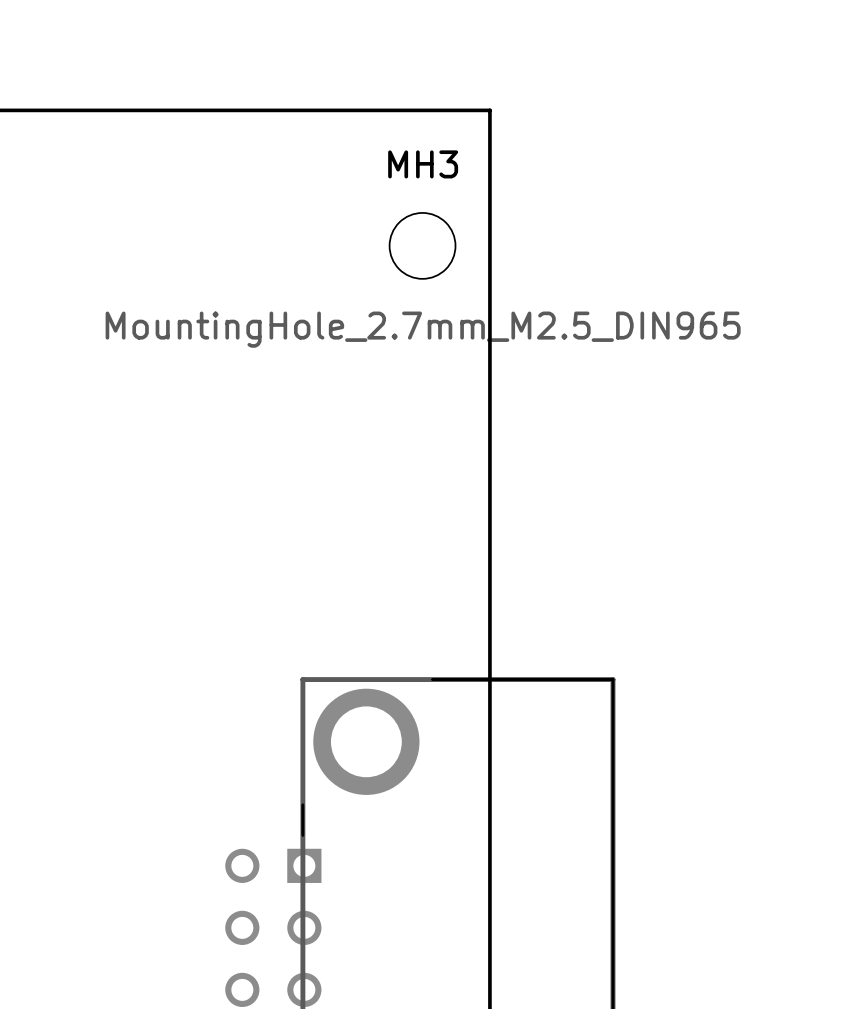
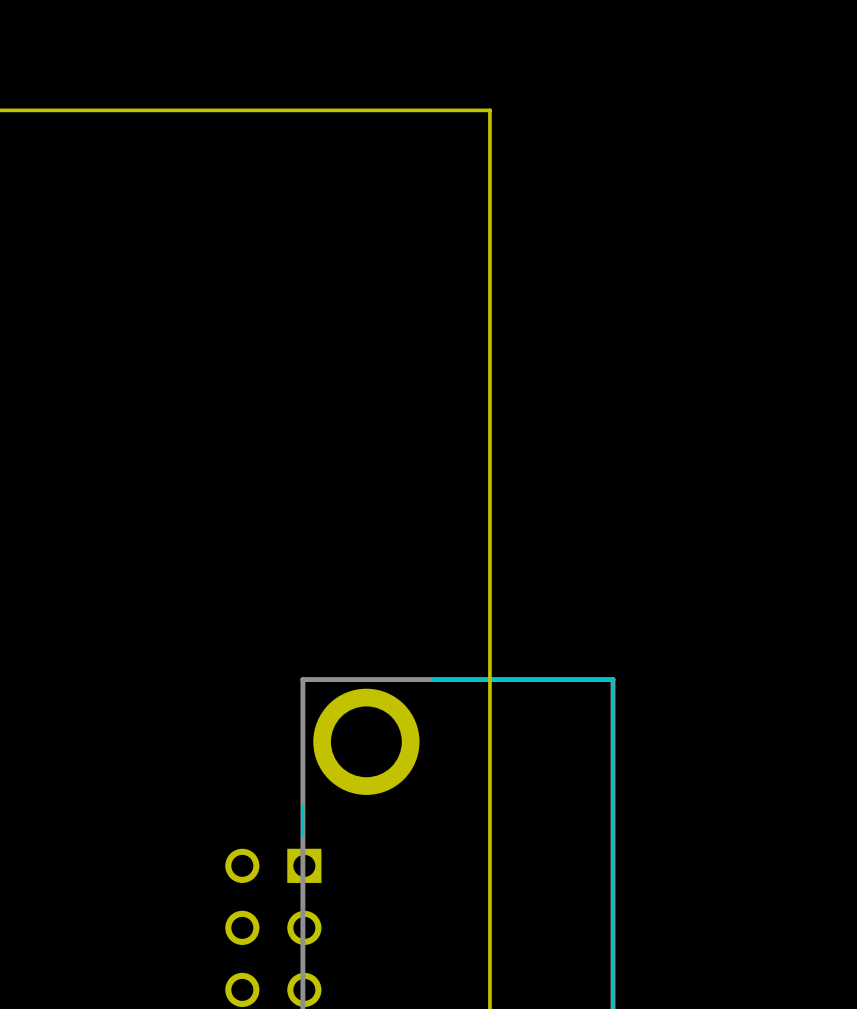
MH3: MountingHole_2.7mm_M2.5_DIN965 (422, 245) -> none

